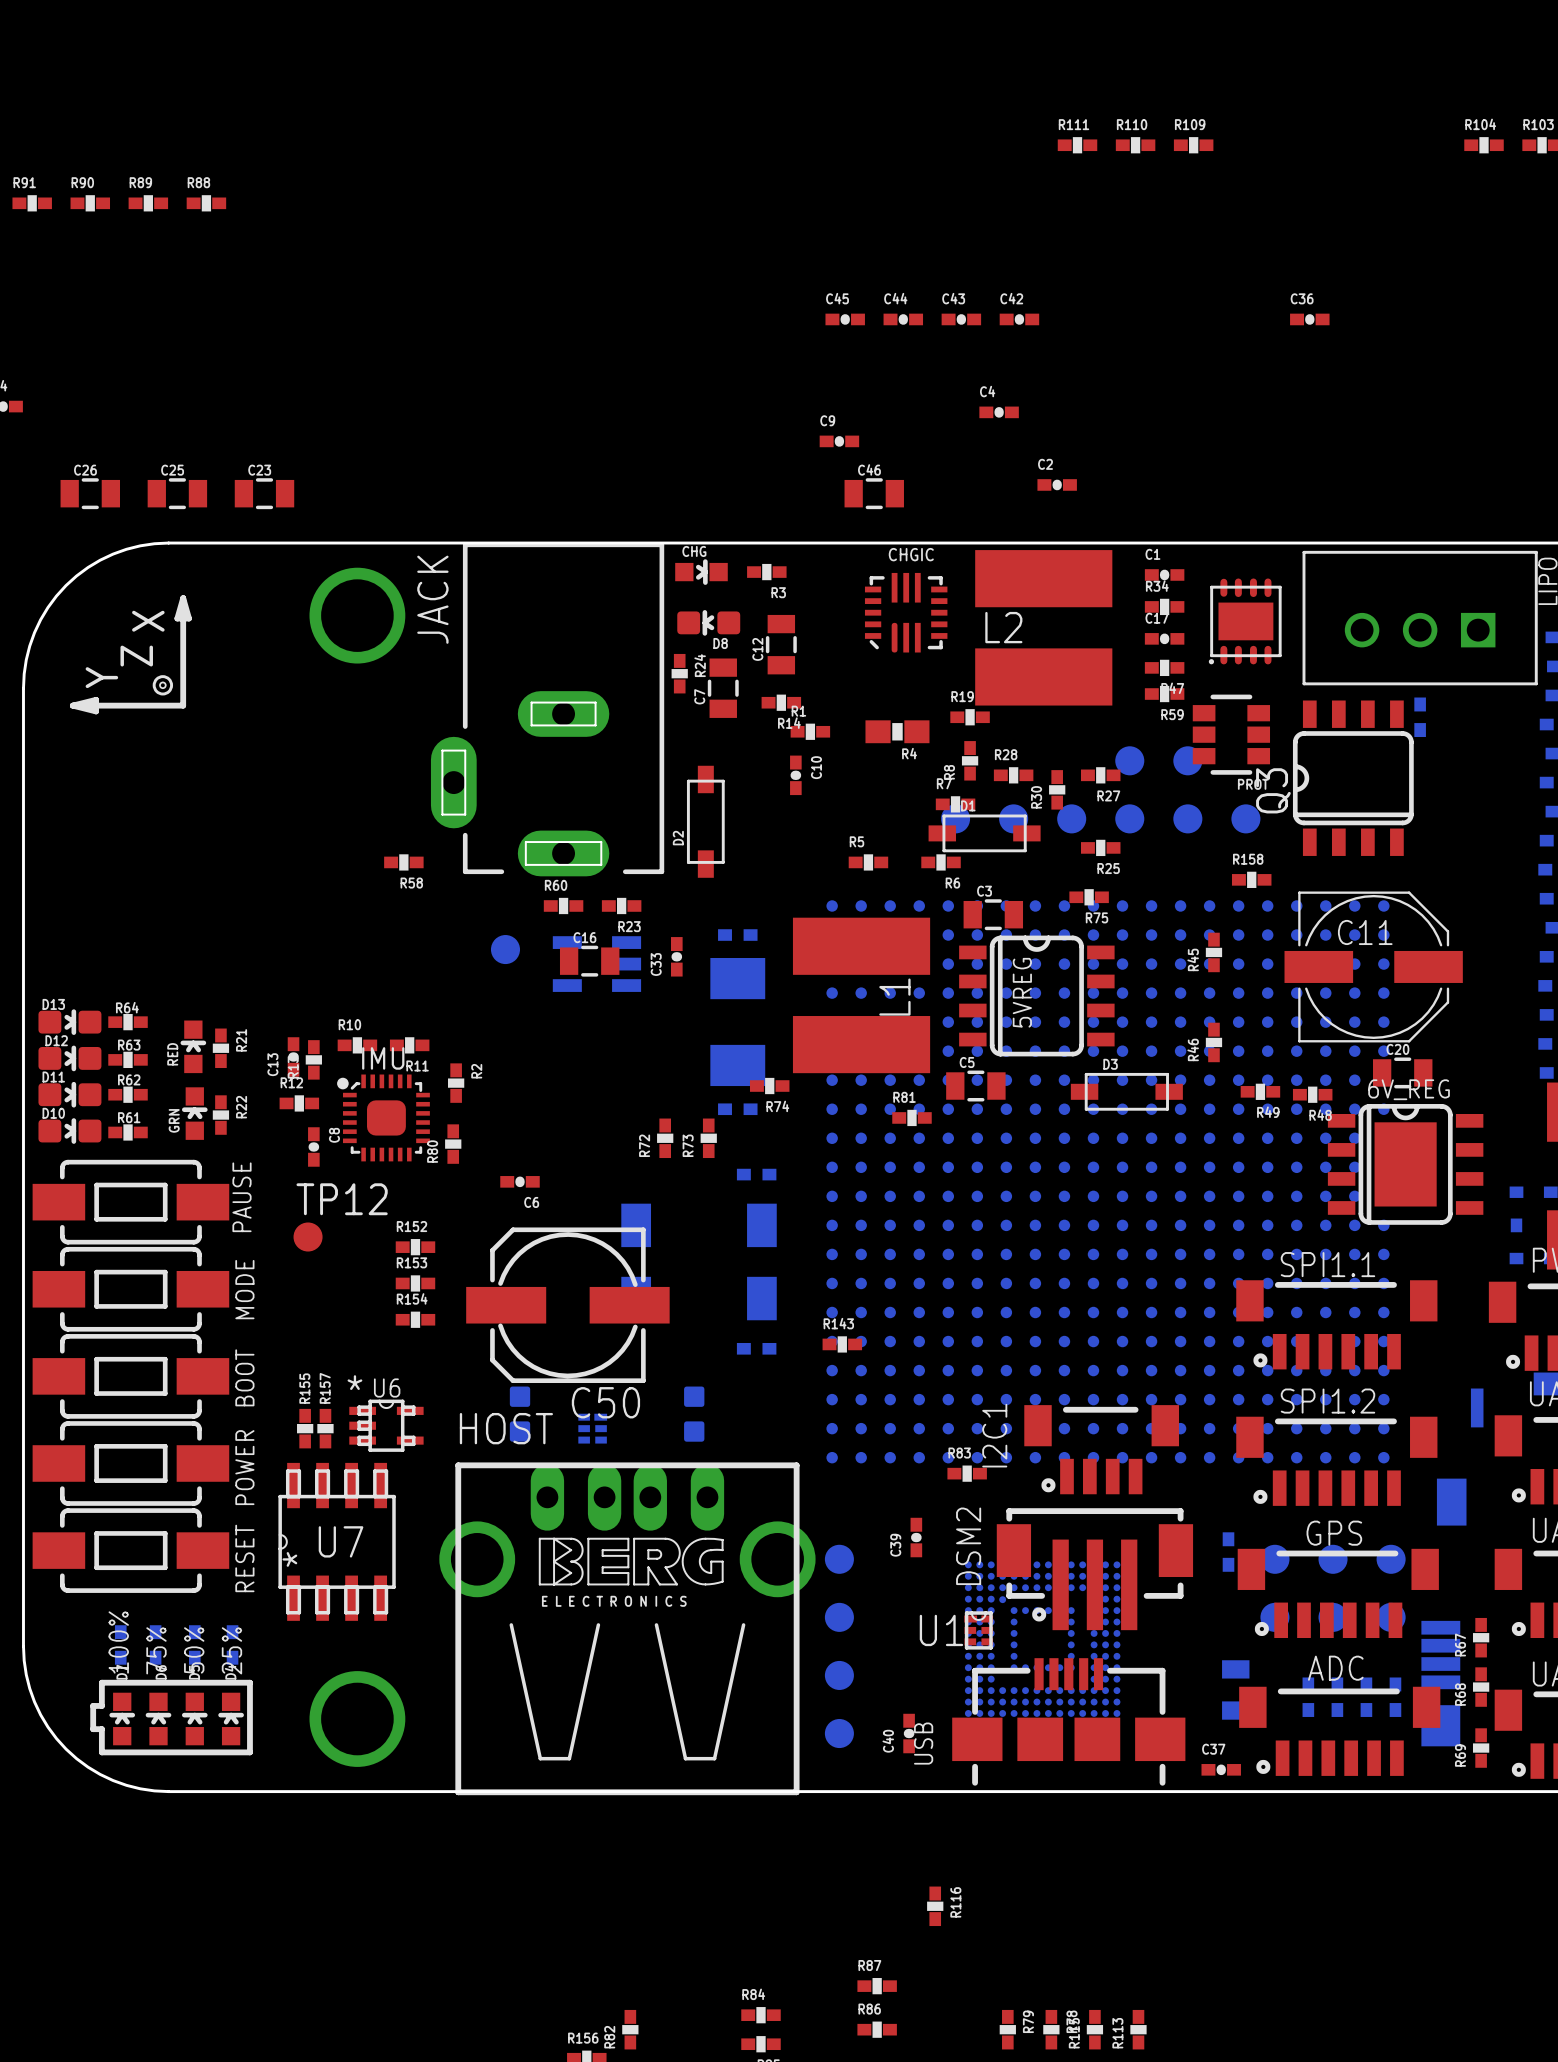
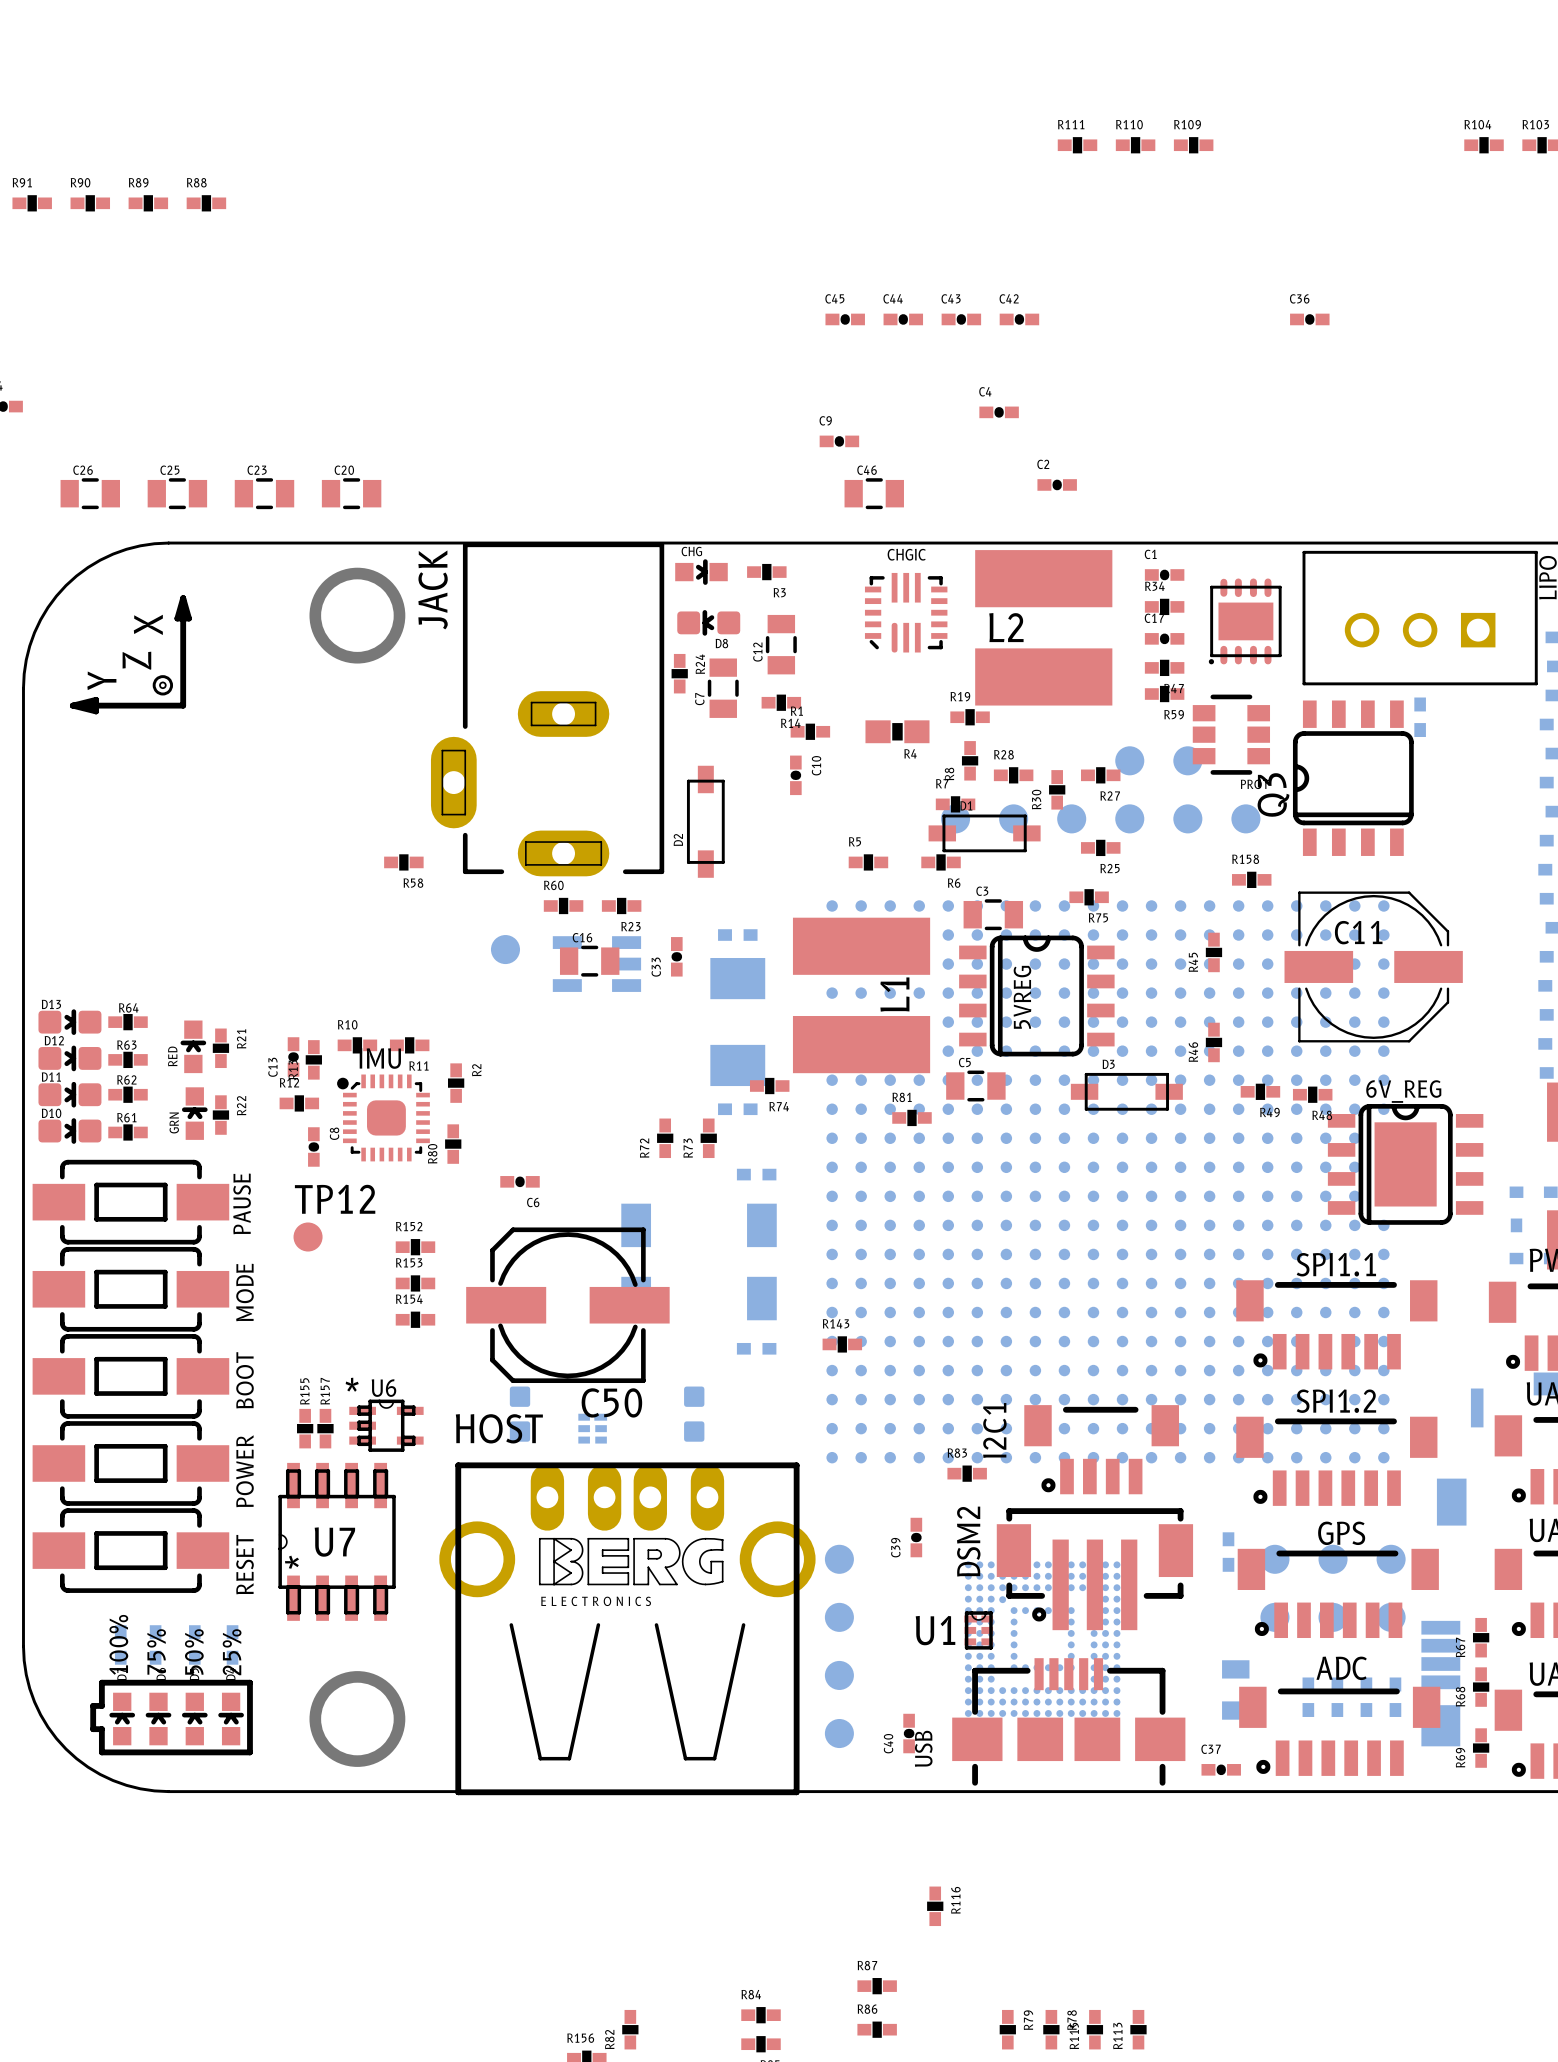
C20 position: (1402, 1072) -> (351, 493)

